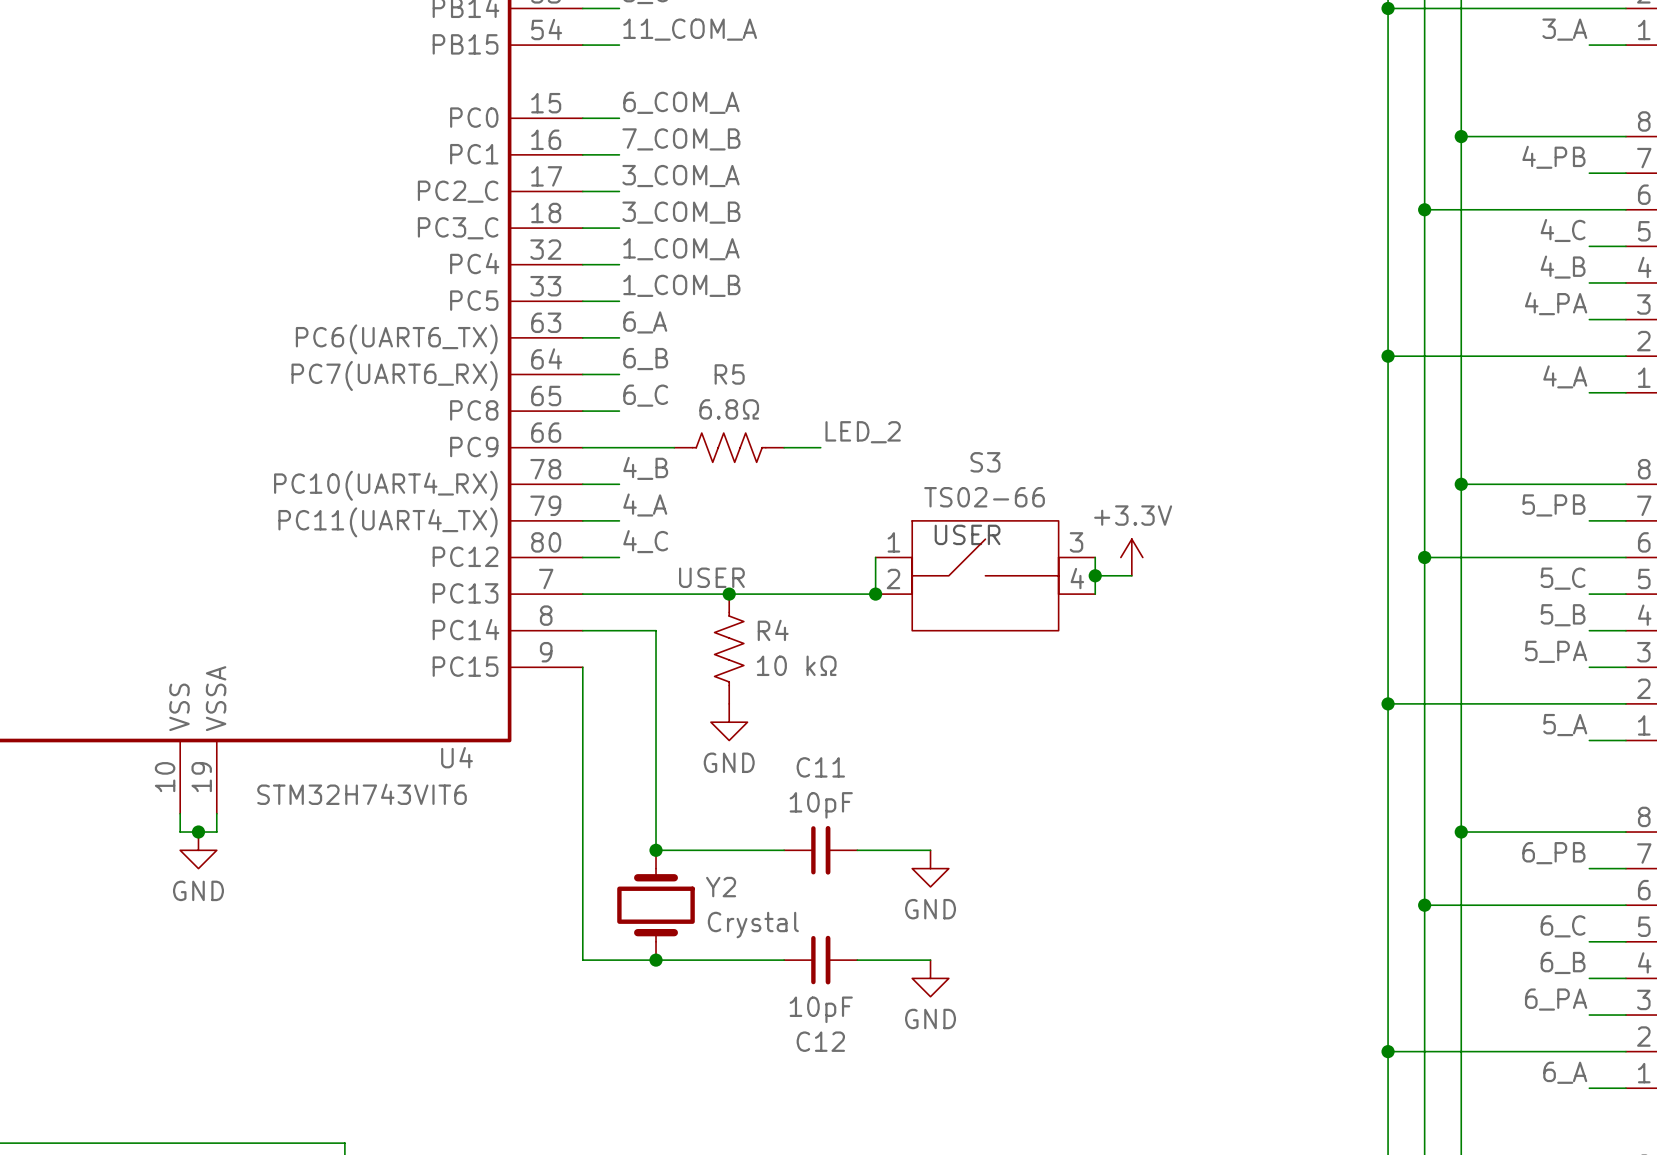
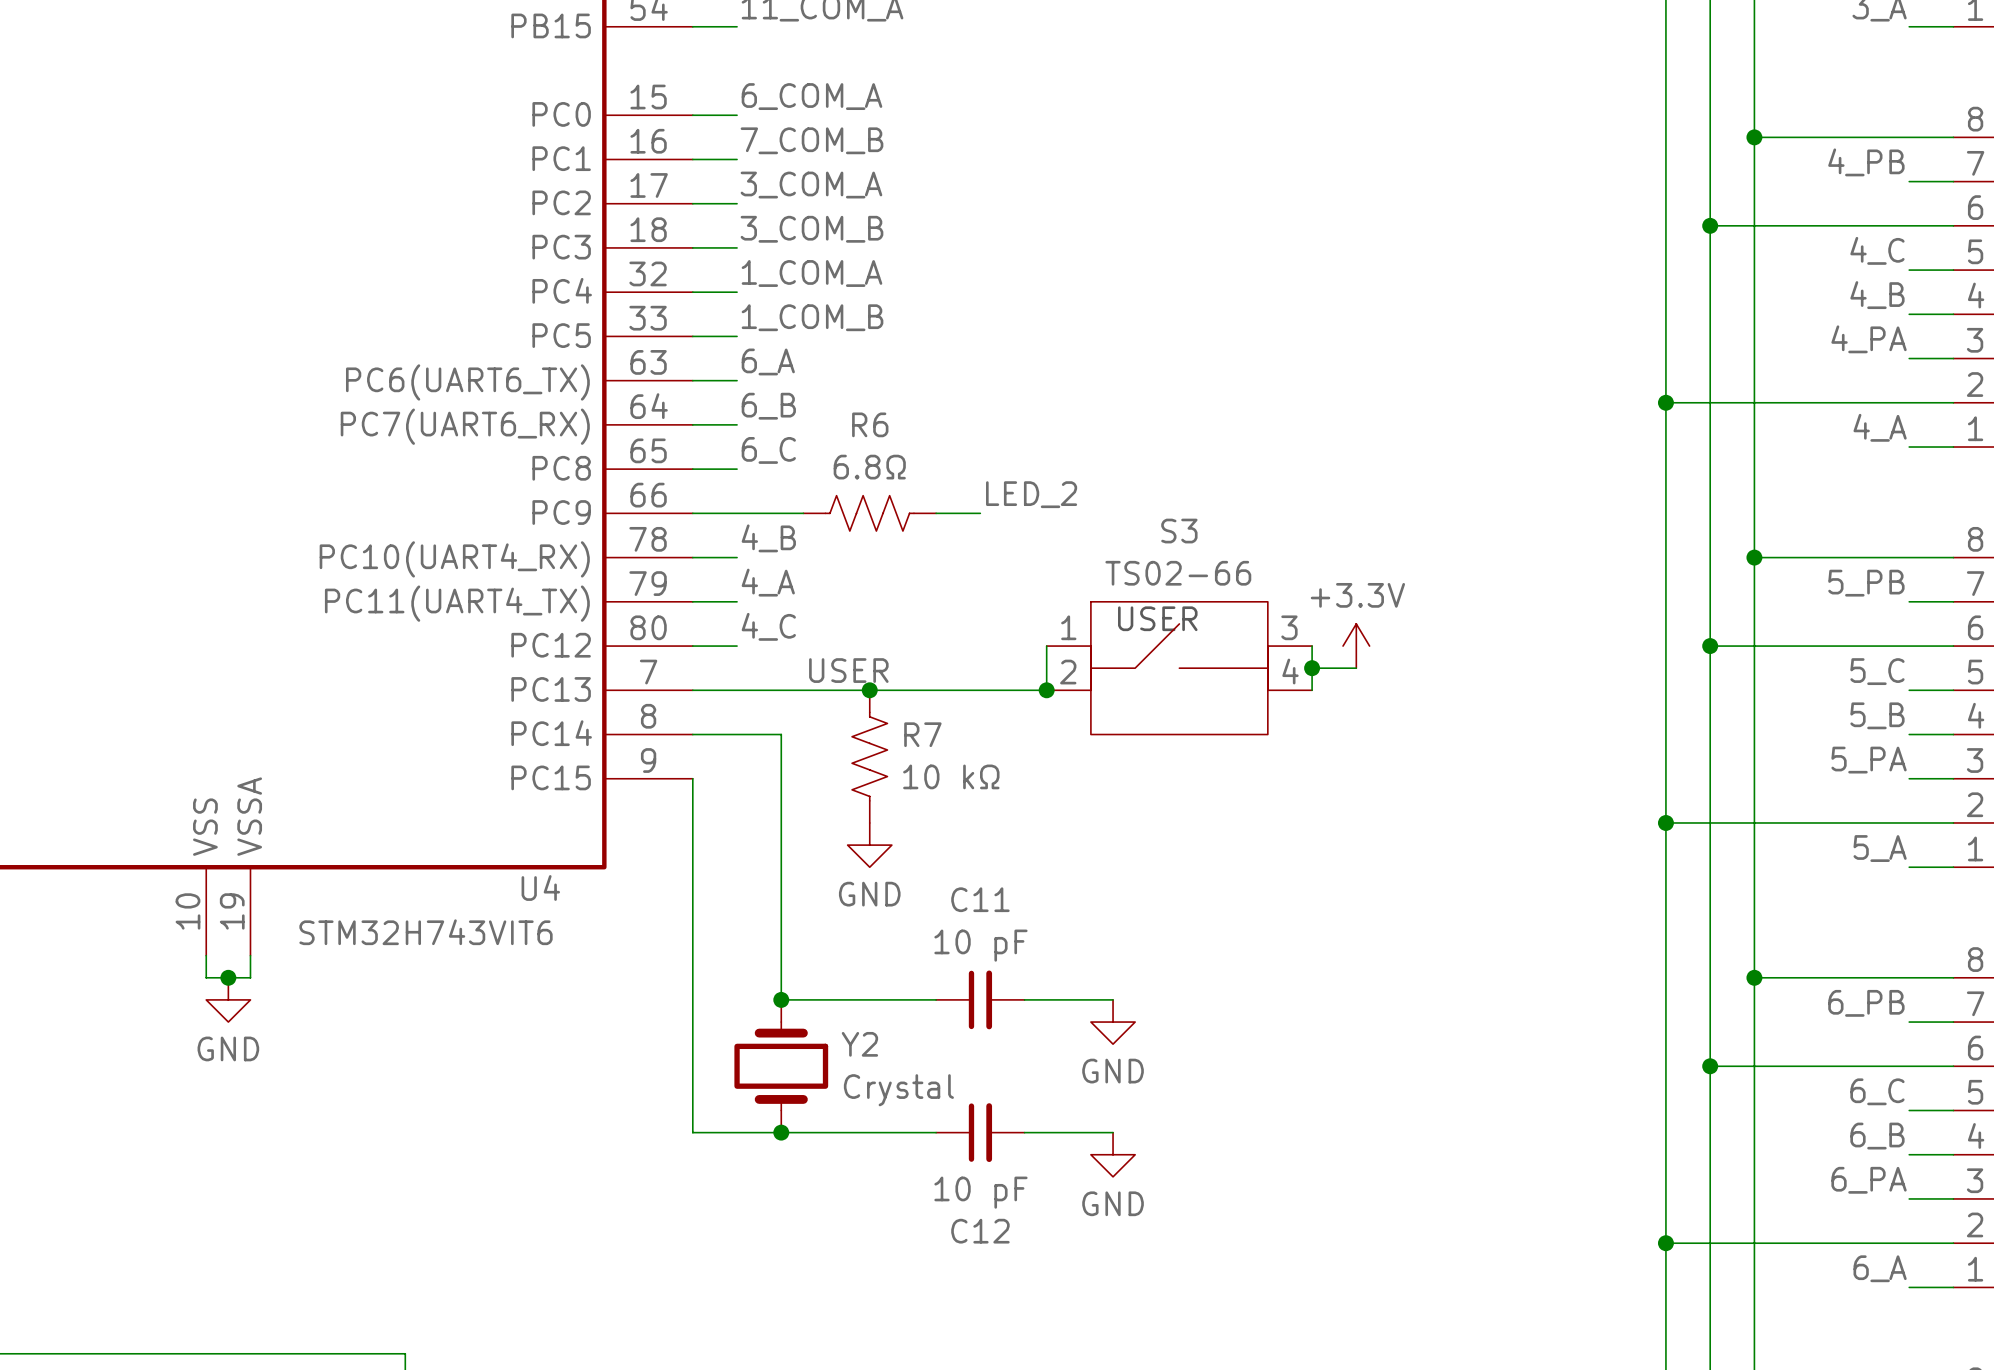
U4 pin name: PC2_C (458, 191) -> PC2 (561, 202)
U4 pin name: PC3_C (458, 228) -> PC3 (561, 247)
R5 name: R5 (729, 374) -> R6 (870, 424)
R4 name: R4 (773, 630) -> R7 (922, 734)
C11 value: 10pF (821, 805) -> 10 pF (980, 945)
C12 value: 10pF (821, 1009) -> 10 pF (980, 1192)

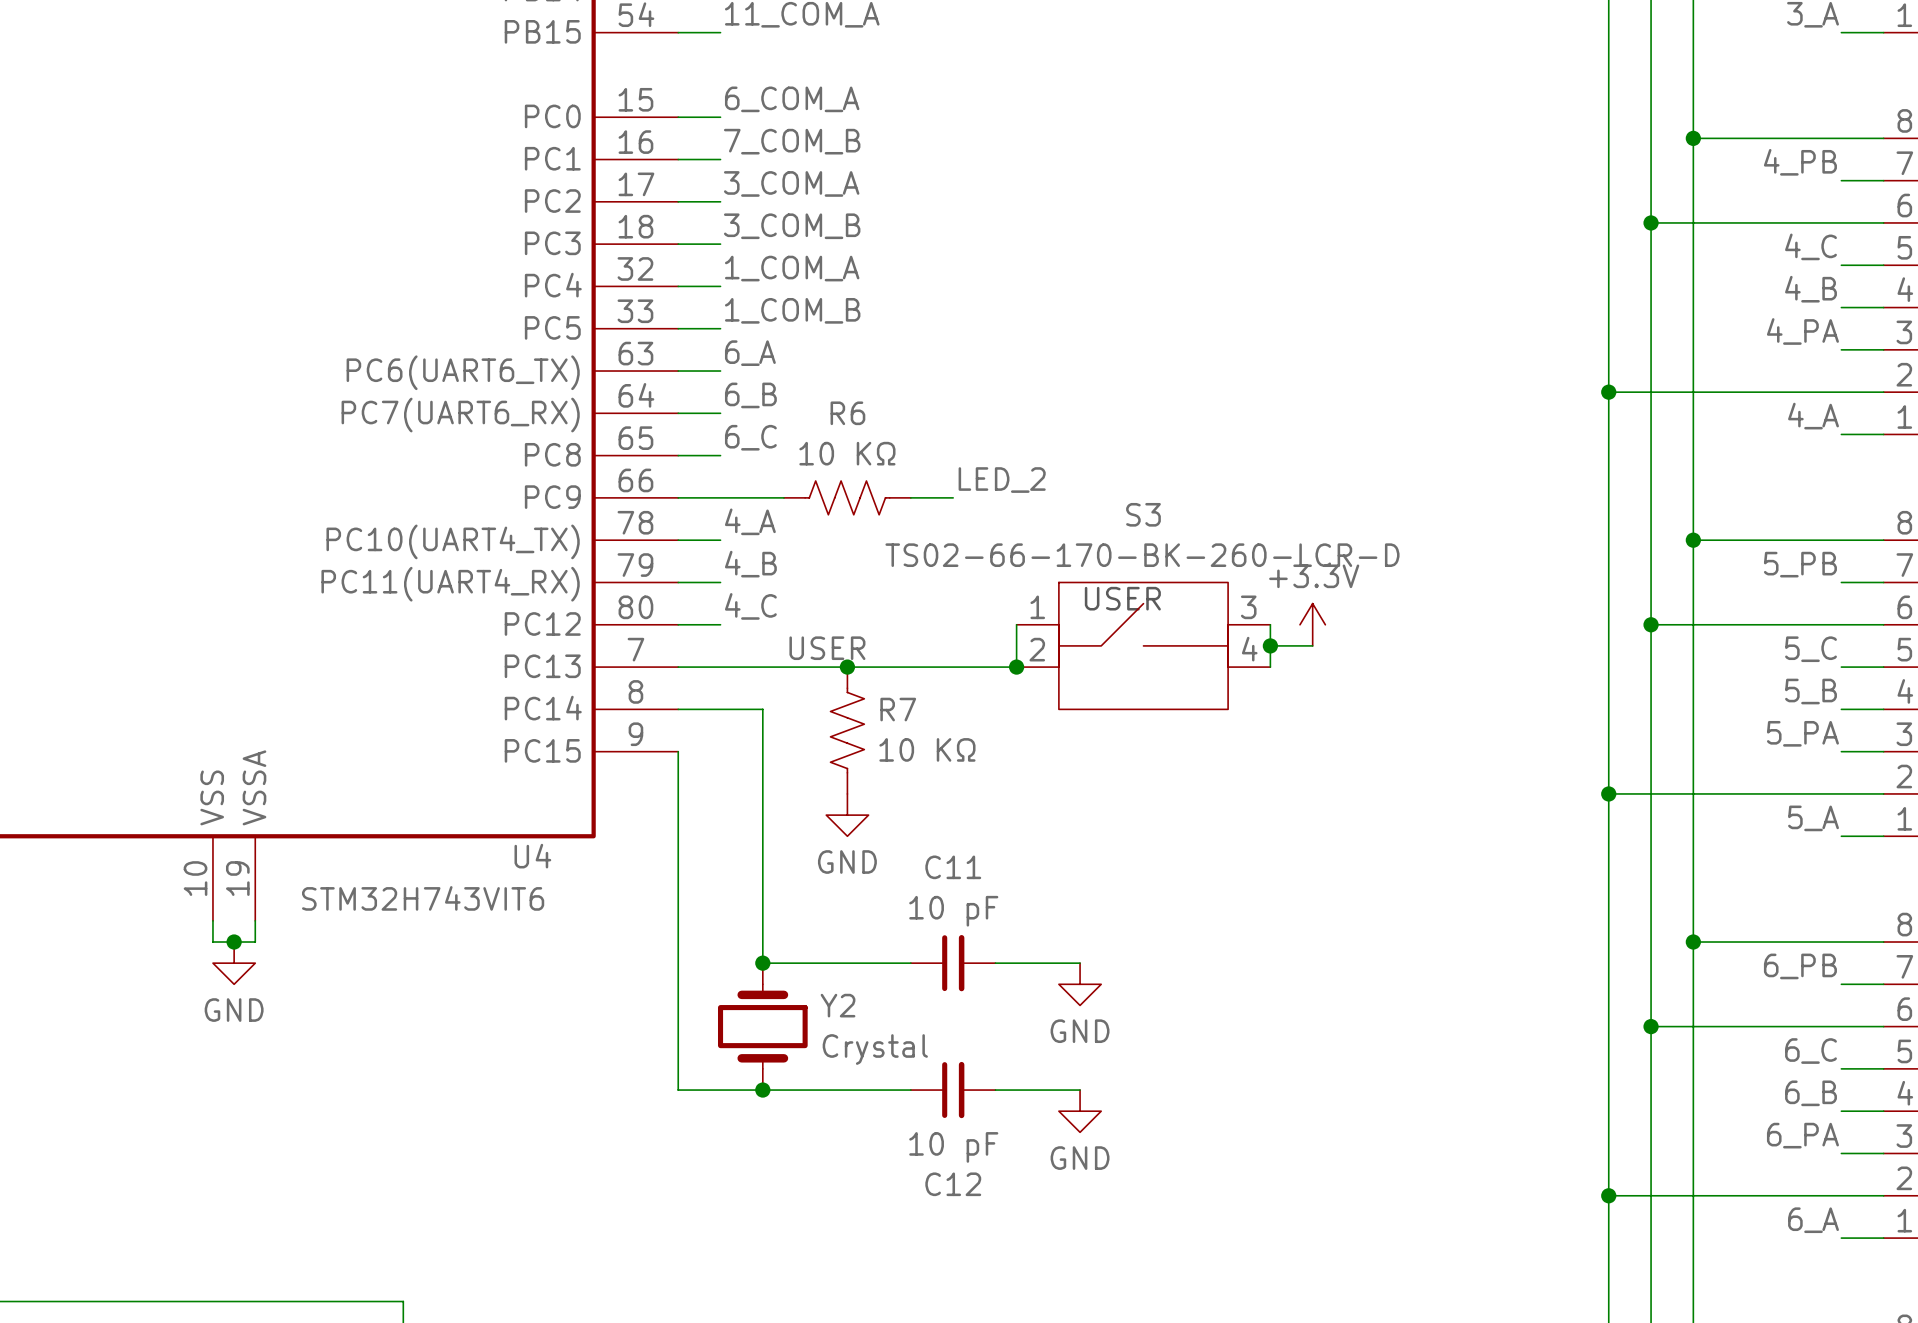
R6 value: 6.8Ω (869, 467) -> 10 KΩ (847, 453)
label: 4_B (768, 538) -> 4_A (750, 521)
U4 pin name: PC10(UART4_RX) (454, 559) -> PC10(UART4_TX) (453, 541)
S3 value: TS02-66 (1178, 573) -> TS02-66-170-BK-260-LCR-D (1142, 555)
label: 4_A (768, 582) -> 4_B (750, 564)
U4 pin name: PC11(UART4_TX) (457, 603) -> PC11(UART4_RX) (450, 584)
R7 value: 10 kΩ (951, 776) -> 10 KΩ (927, 749)

